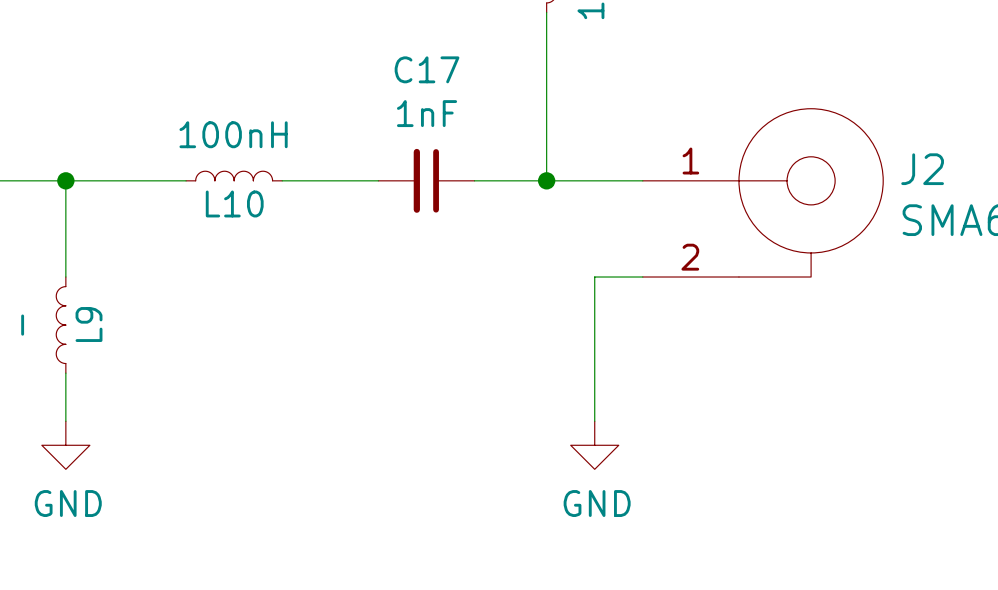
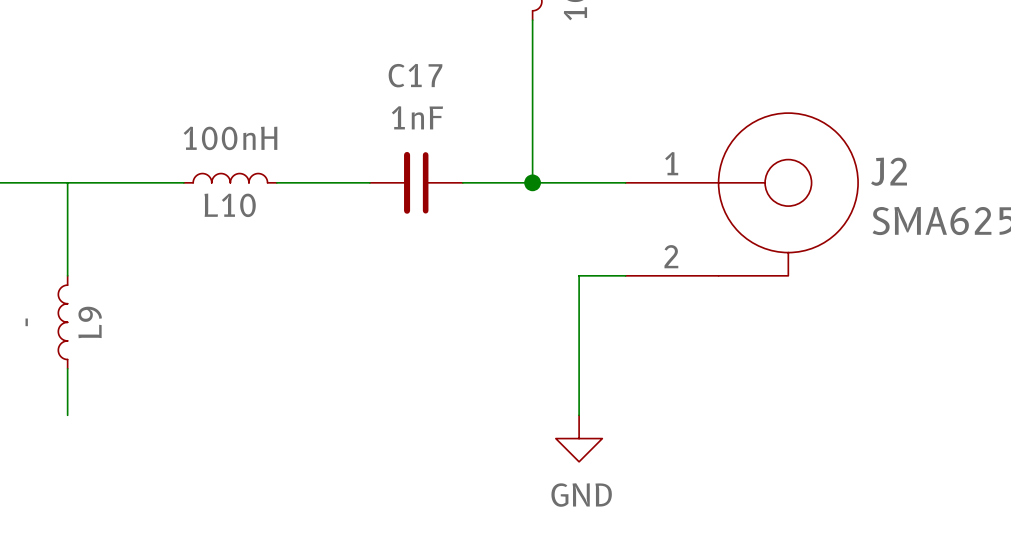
junction: (65, 180) -> none
power symbol: GND (65, 445) -> none

